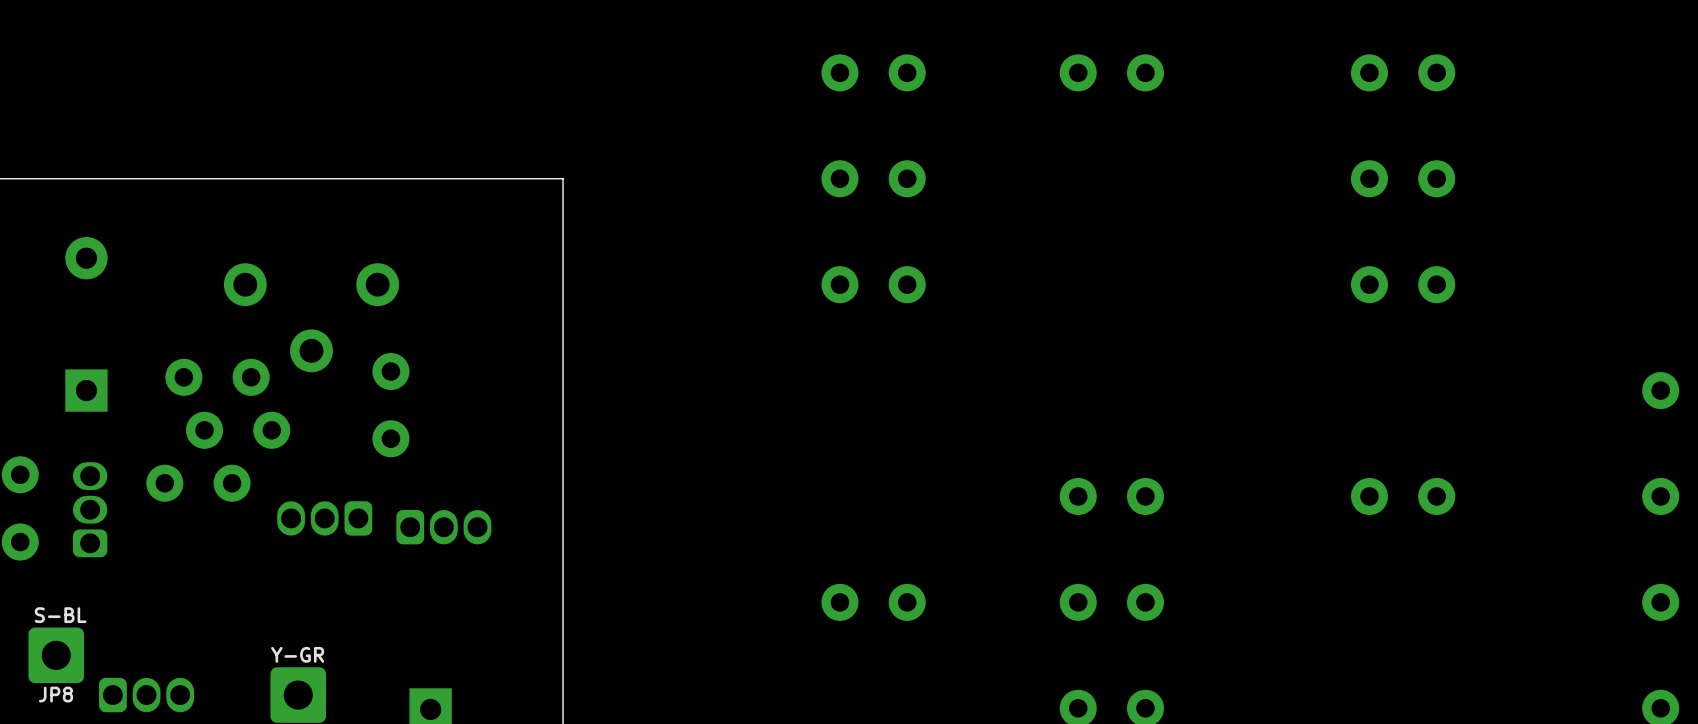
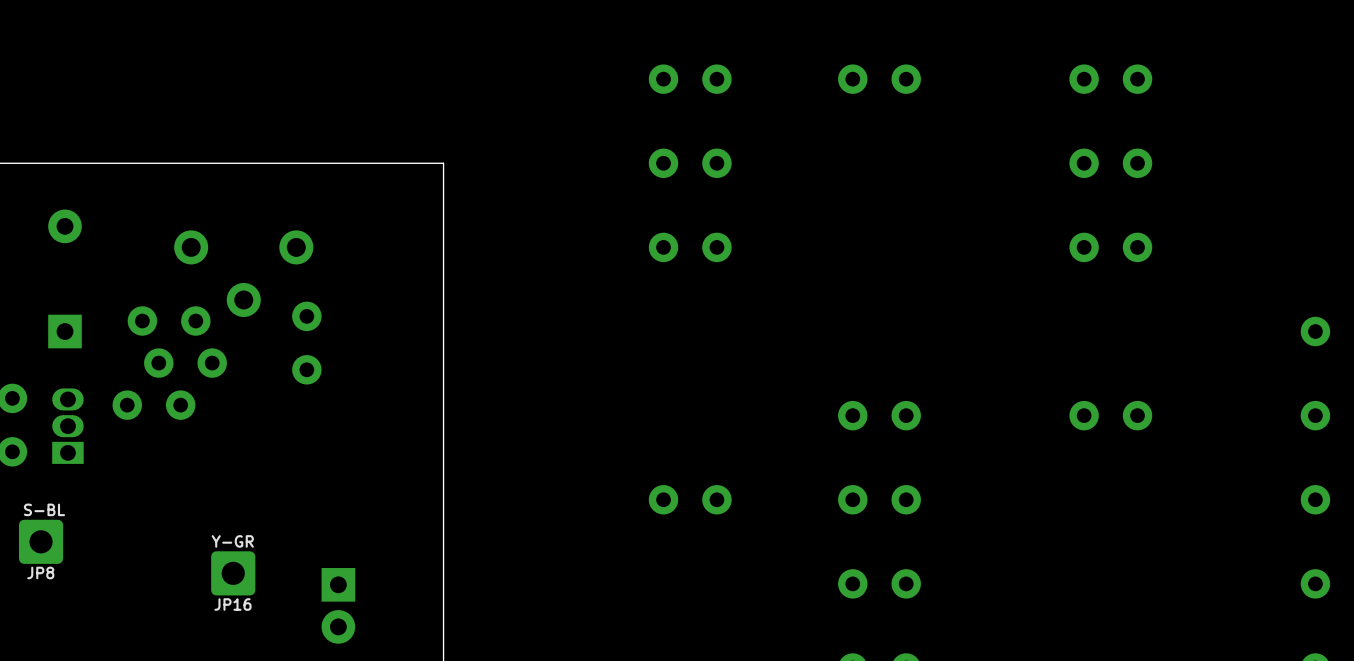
part footprint: [72, 462, 108, 558] -> [52, 388, 84, 464]
part: (324, 518) -> none
part: (443, 527) -> none
part: (146, 695) -> none

